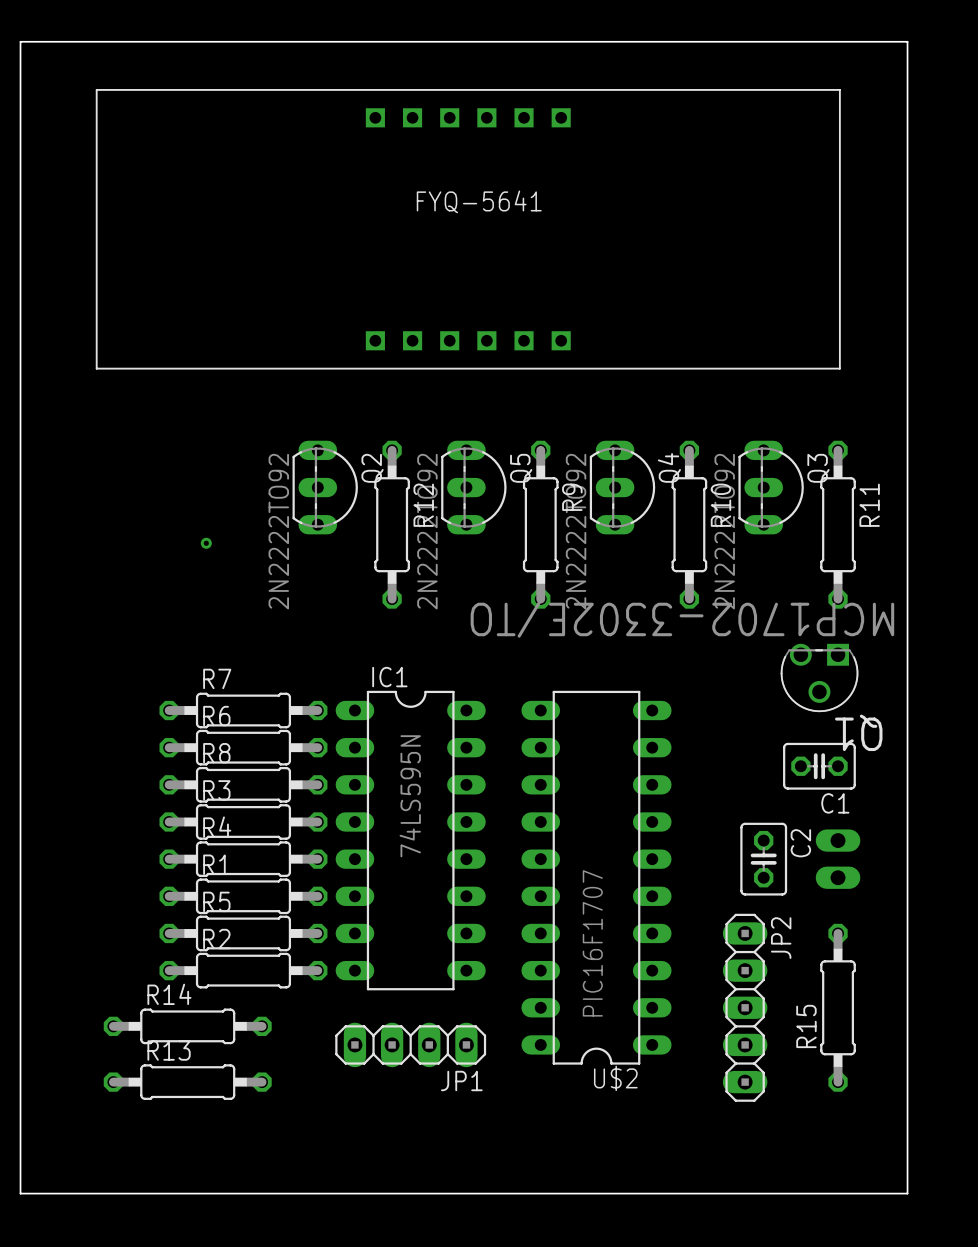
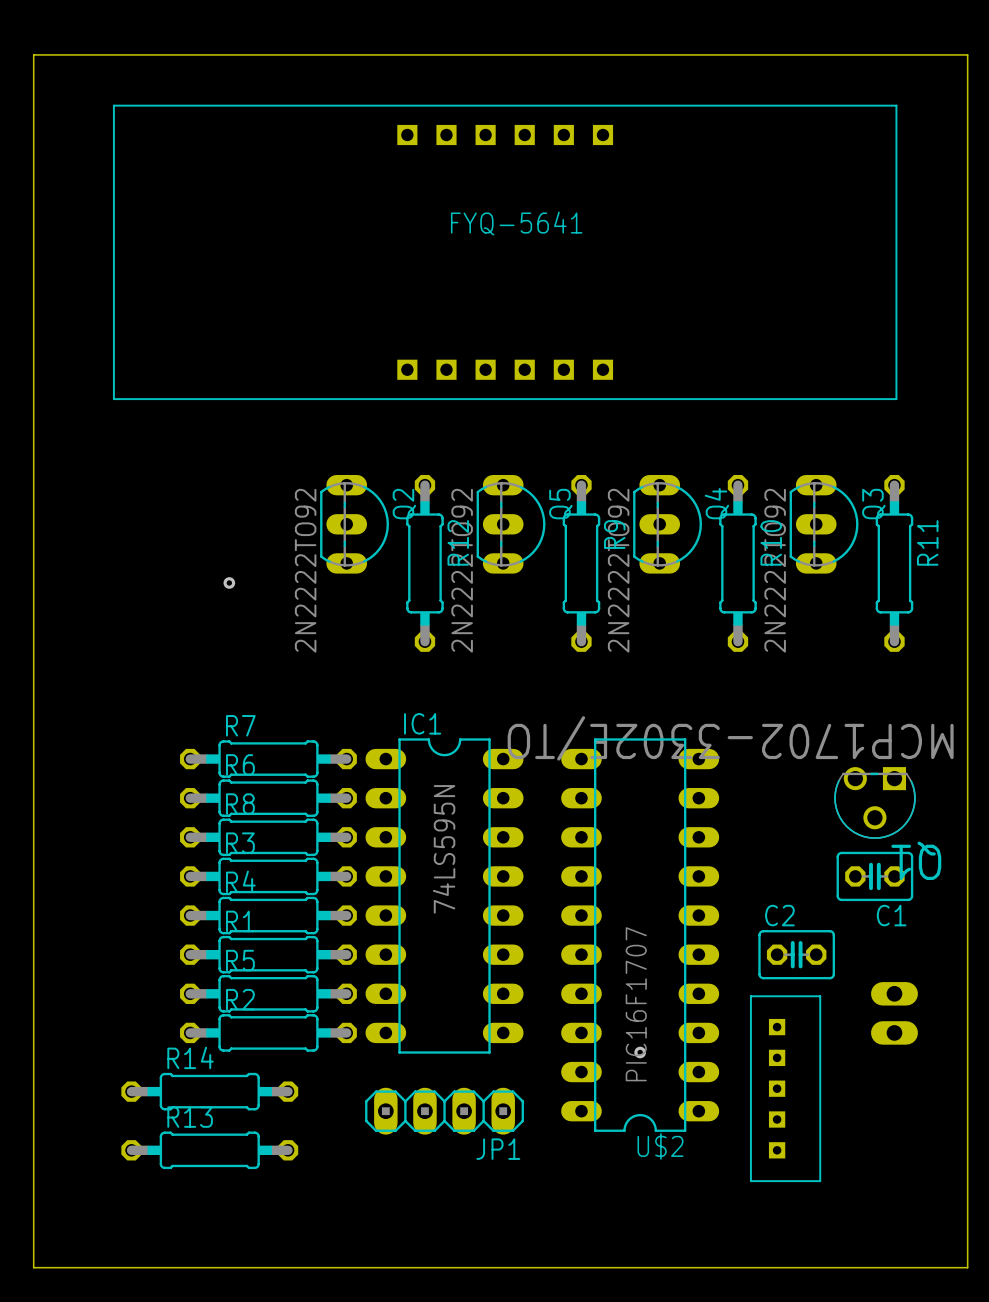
Q1 position: (819, 677) -> (875, 802)
C1 position: (819, 766) -> (874, 876)
C2 name position: C2 (800, 843) -> C2 (779, 915)
C2 rotation: 0° (763, 859) -> 90° clockwise (796, 954)
part position: (838, 859) -> (894, 1013)
via: none -> (640, 1052)
JP2: (745, 1007) -> none
R15: (838, 1007) -> none
part: none -> (785, 1088)

